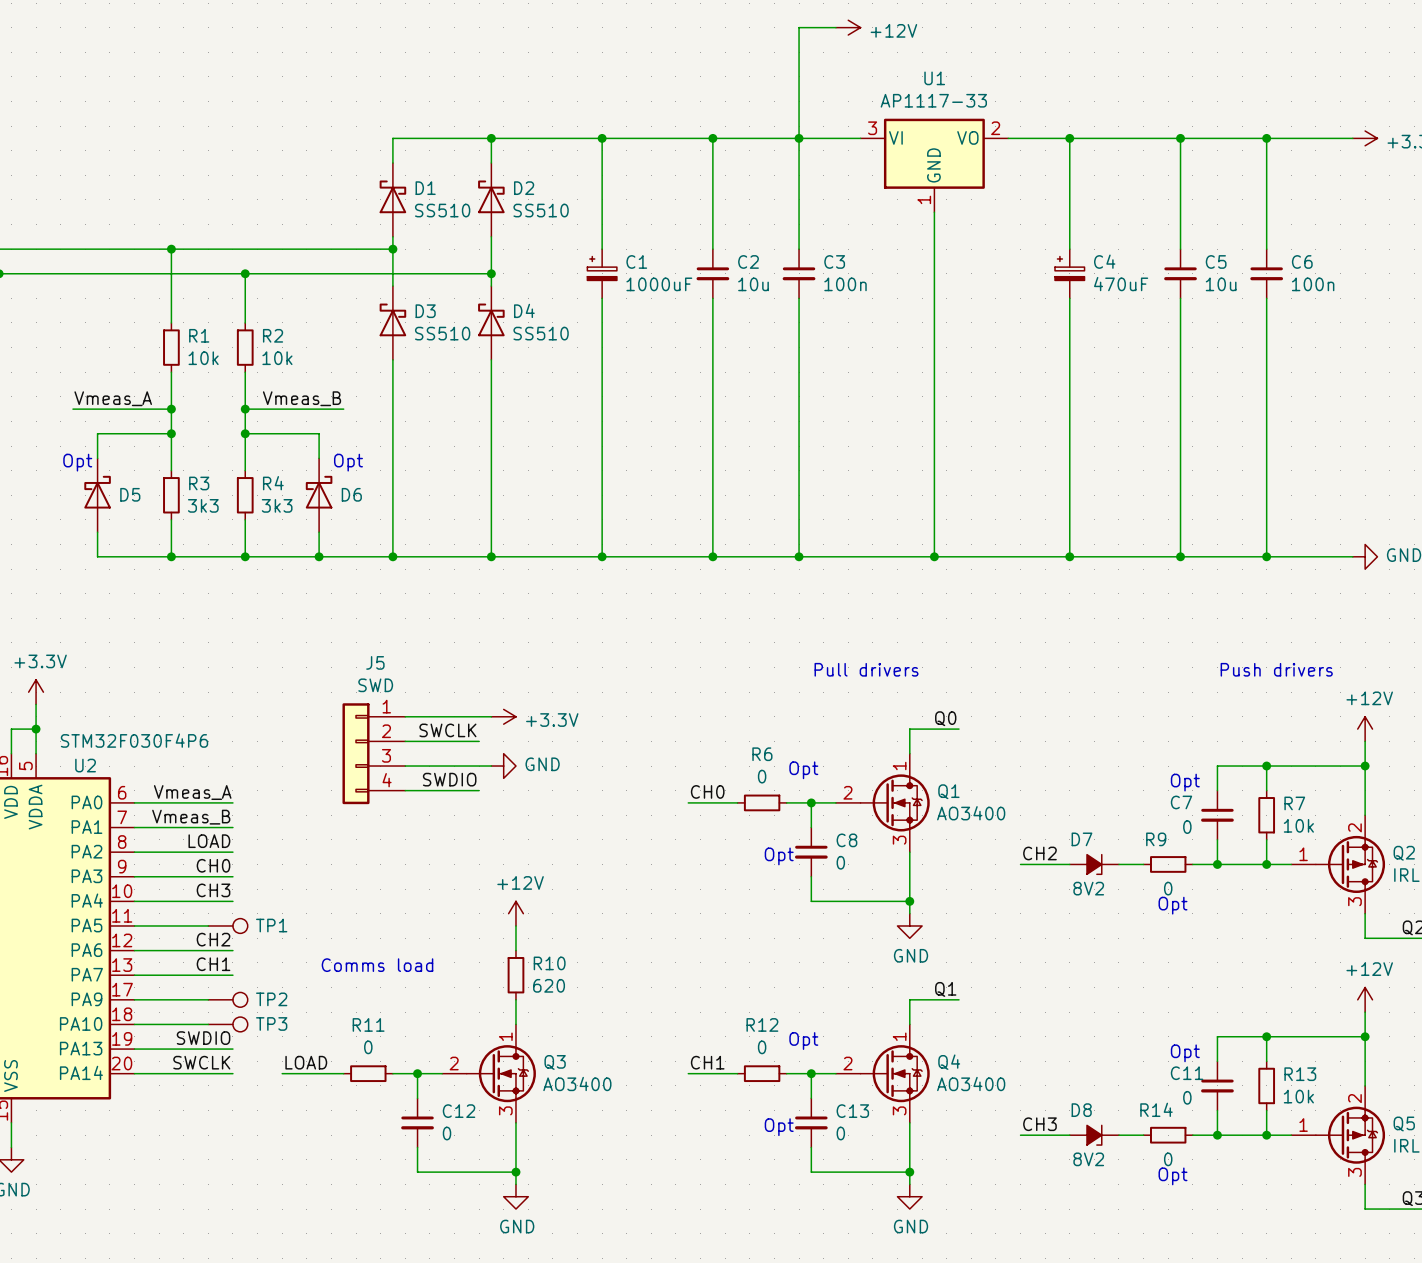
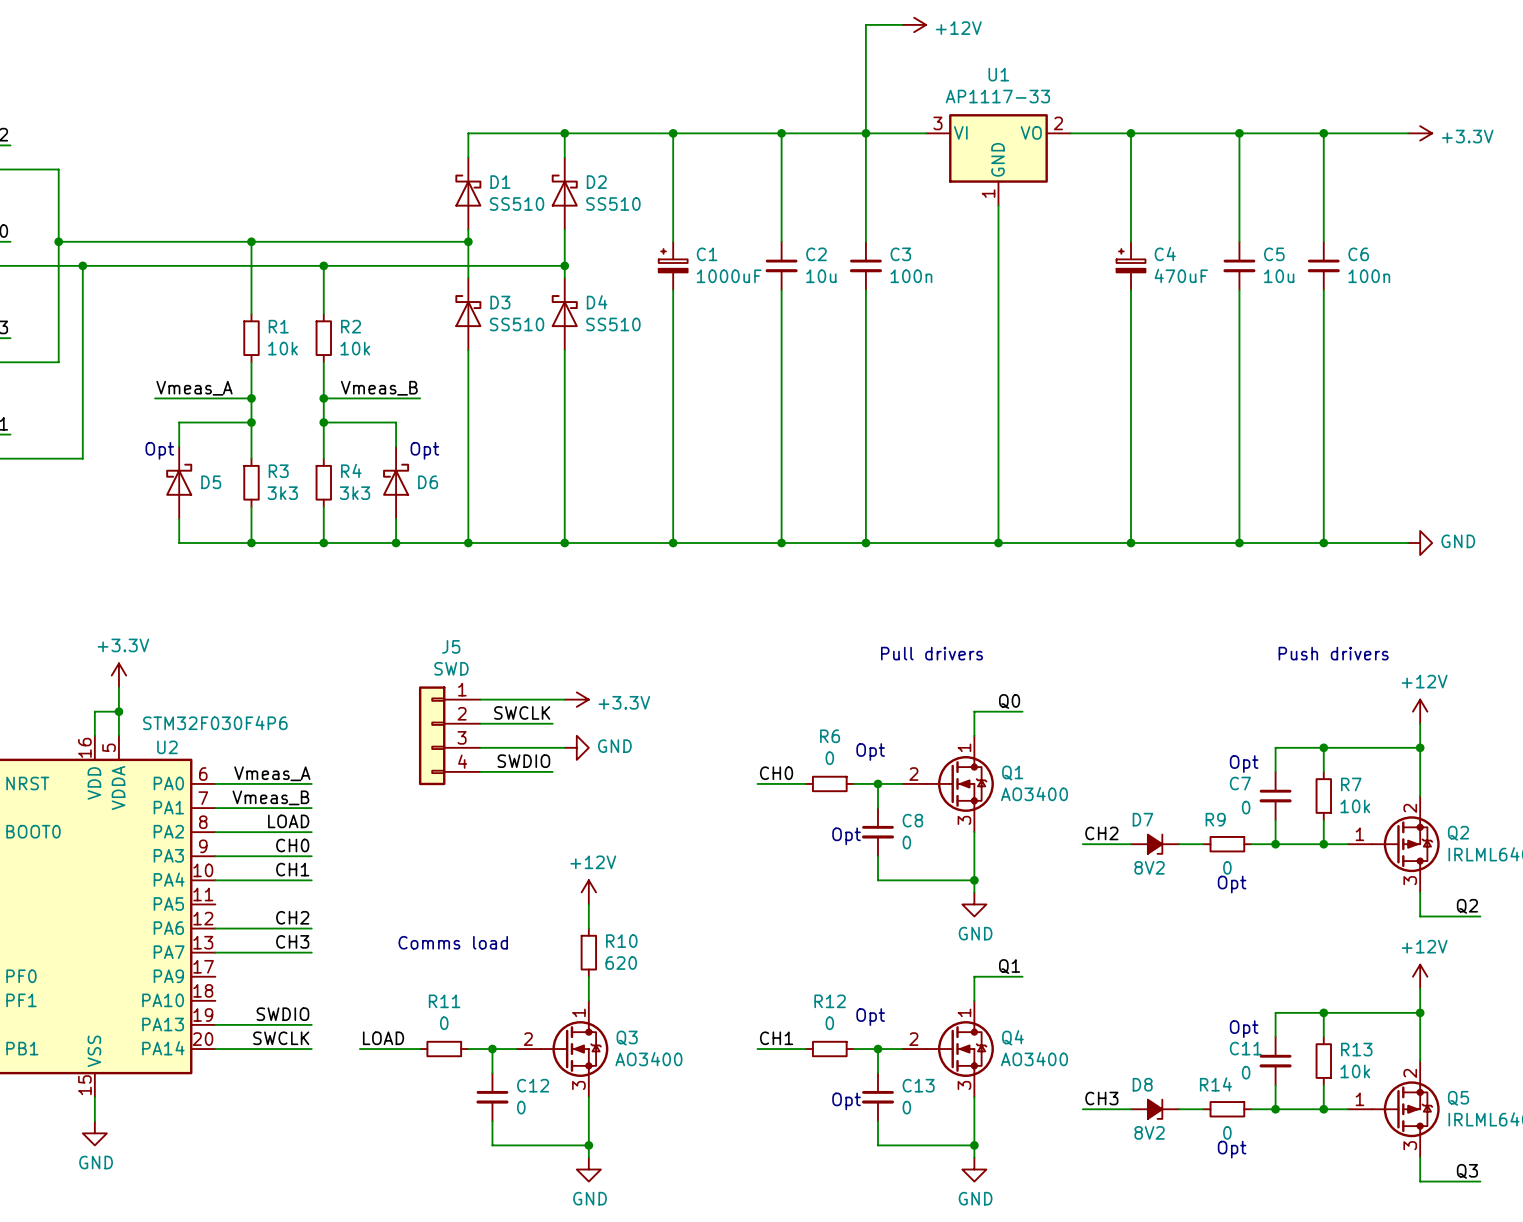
label: CH3 (213, 890) -> CH1 (292, 869)
wire: (134, 925) (208, 925) -> none
TP1: (228, 925) -> none
label: CH1 (213, 964) -> CH3 (292, 941)
wire: (134, 999) (208, 999) -> none
TP2: (228, 999) -> none
wire: (134, 1024) (208, 1024) -> none
TP3: (228, 1024) -> none

